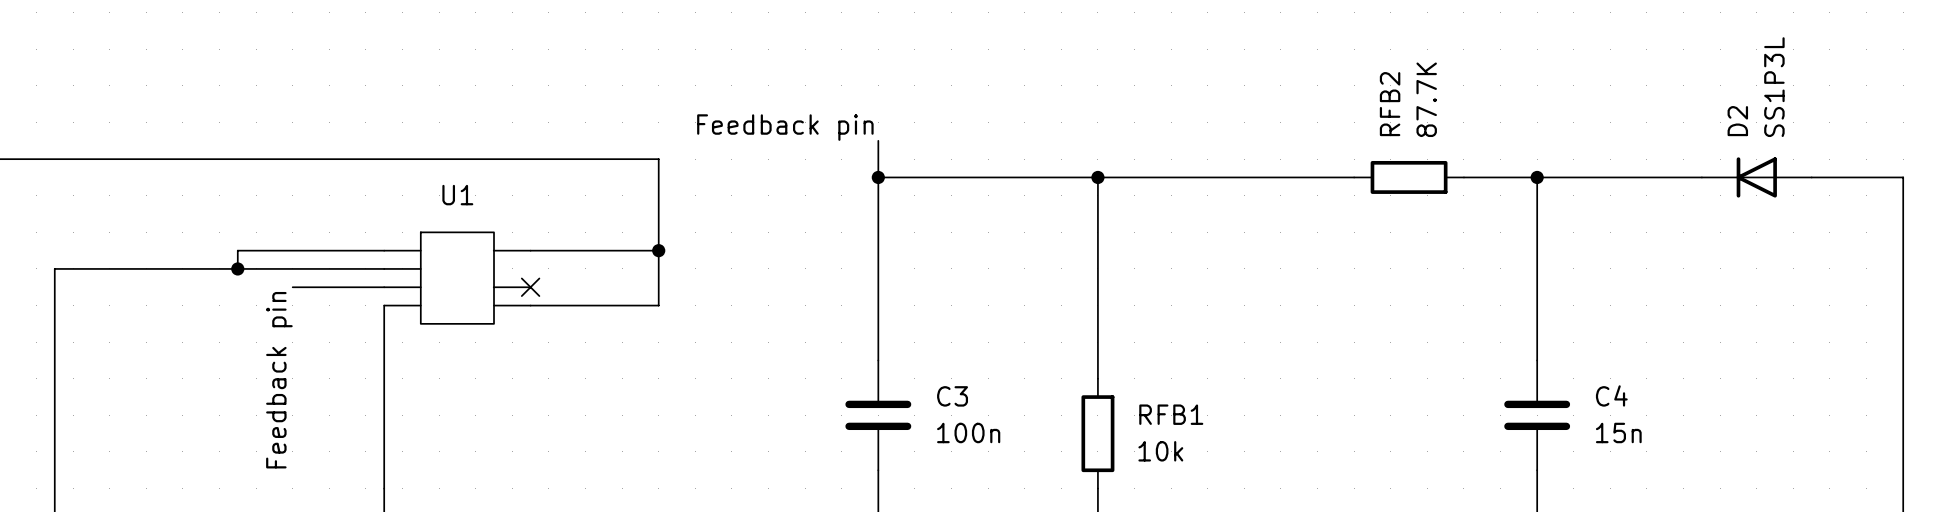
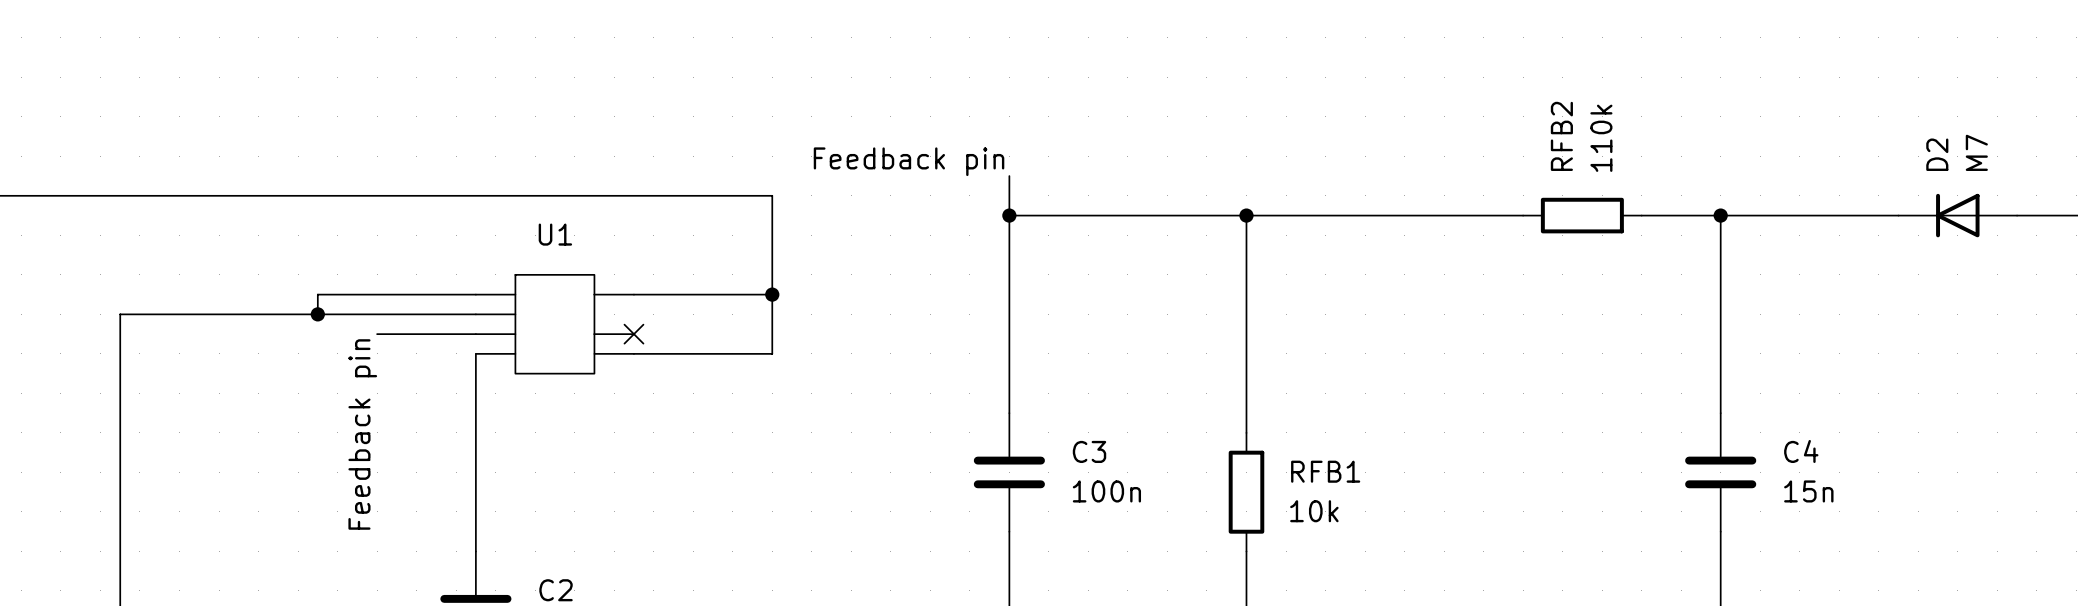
D2 value: SS1P3L (1774, 87) -> M7 (1976, 152)
RFB2 value: 87.7K (1426, 99) -> 110k (1601, 138)

